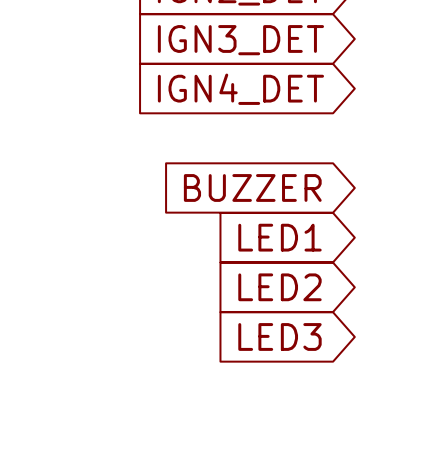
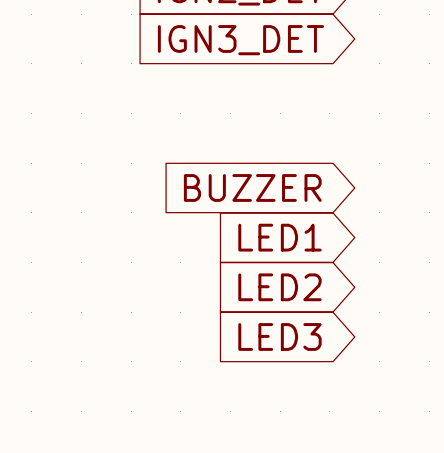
global label: IGN4_DET (240, 89) -> none

